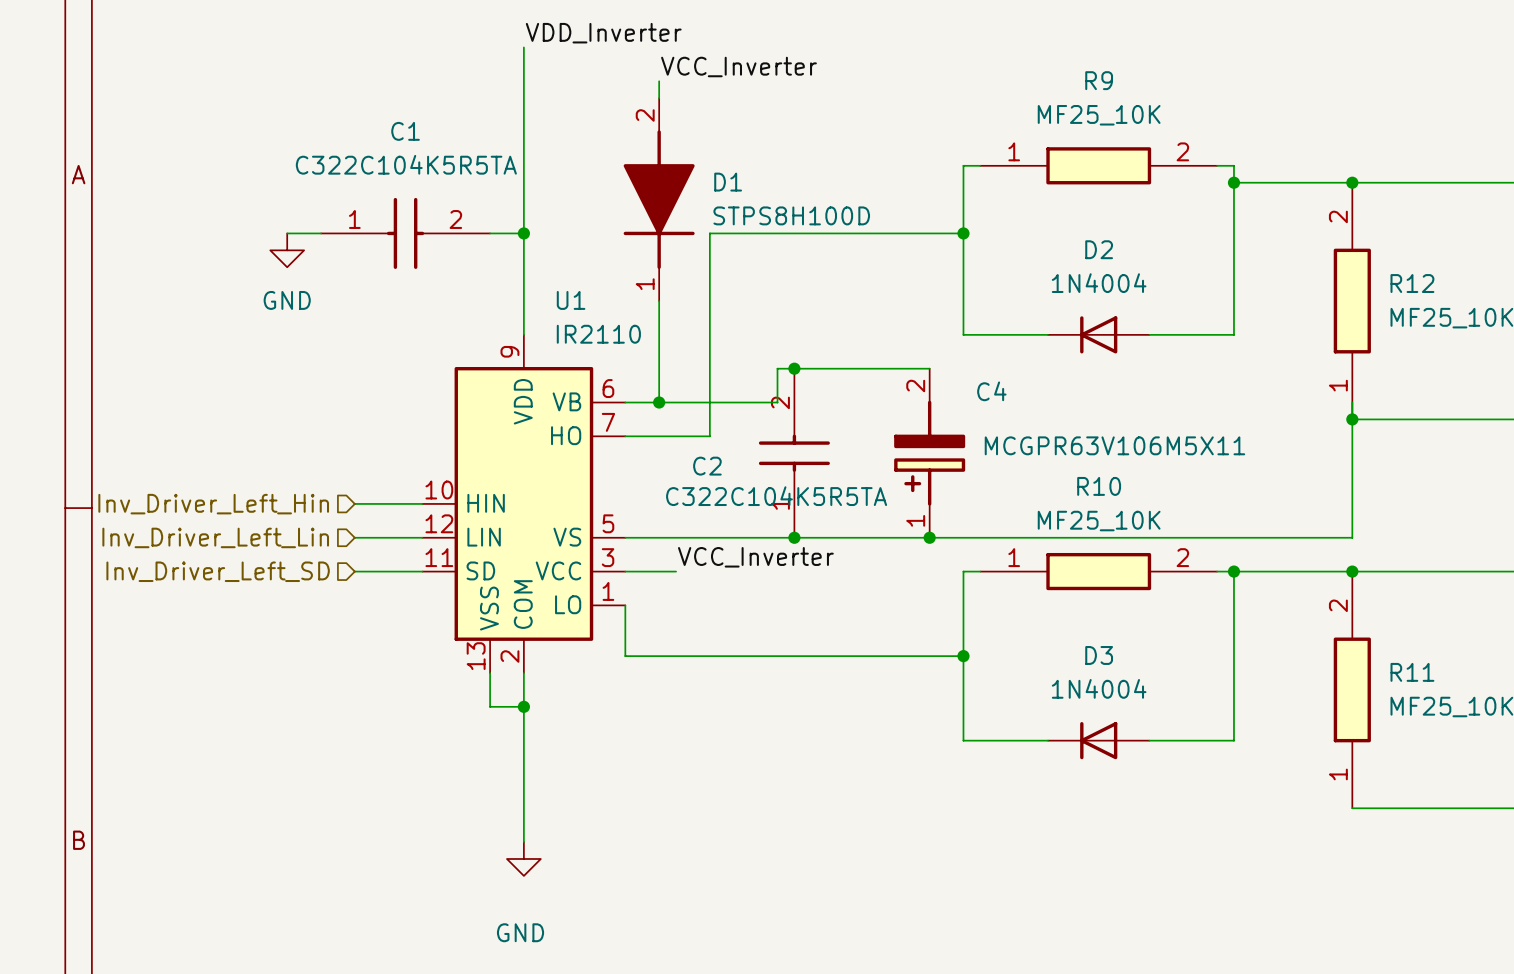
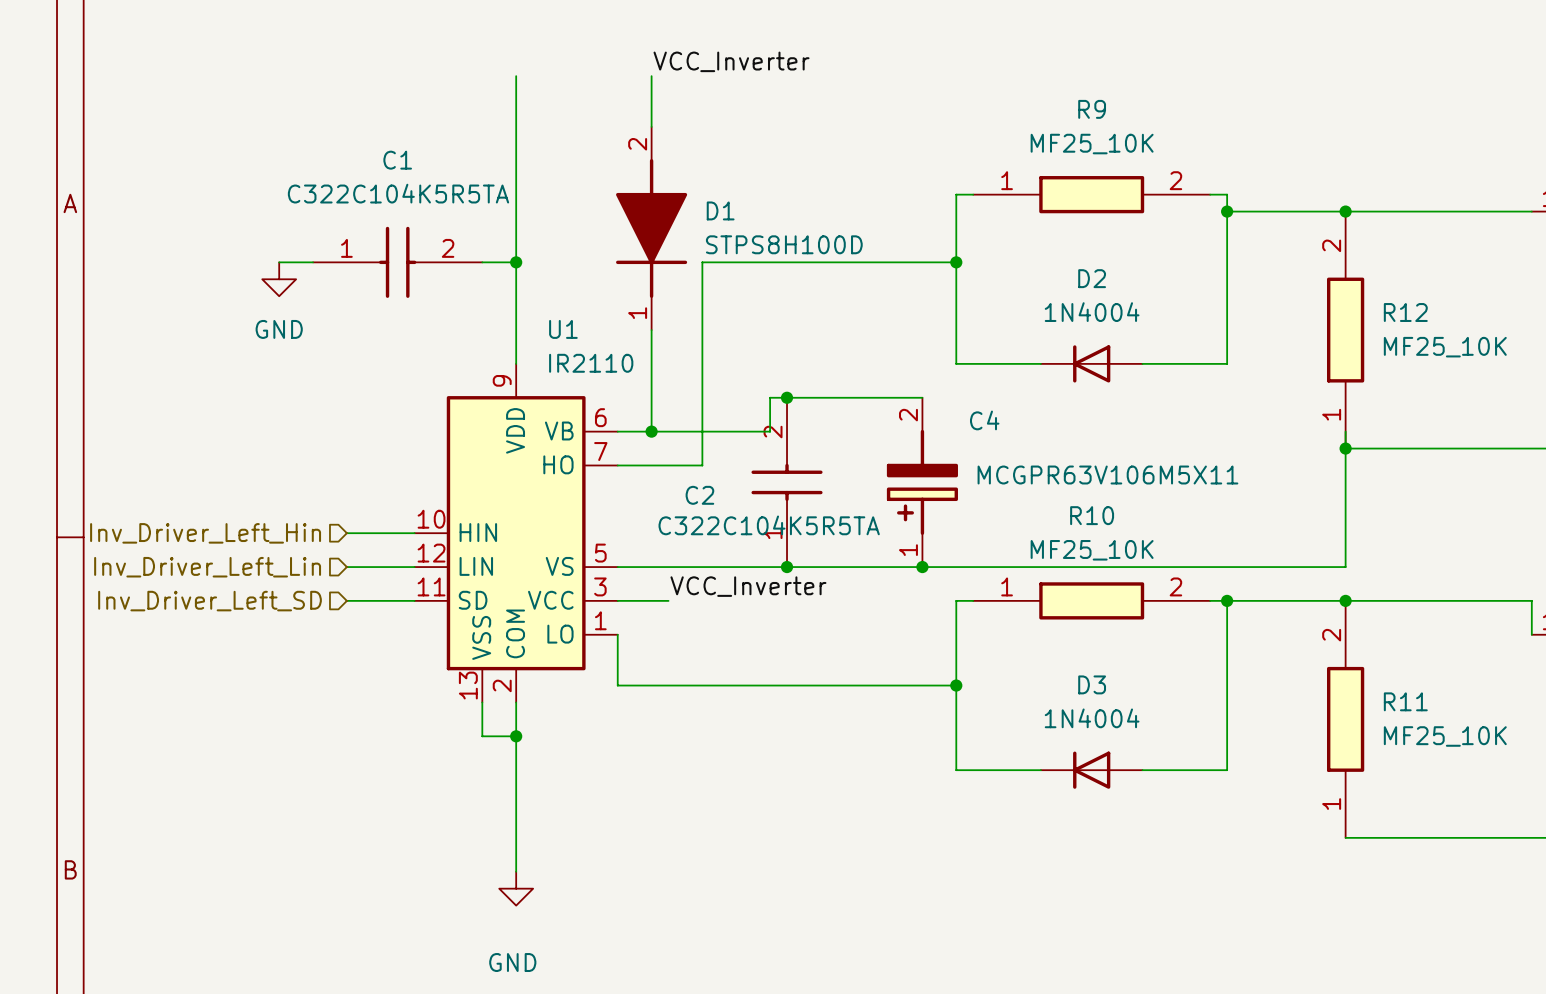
label: VDD_Inverter (603, 33) -> none
wire: none -> (651, 76) (651, 110)
label position: VCC_Inverter (738, 67) -> VCC_Inverter (731, 61)

